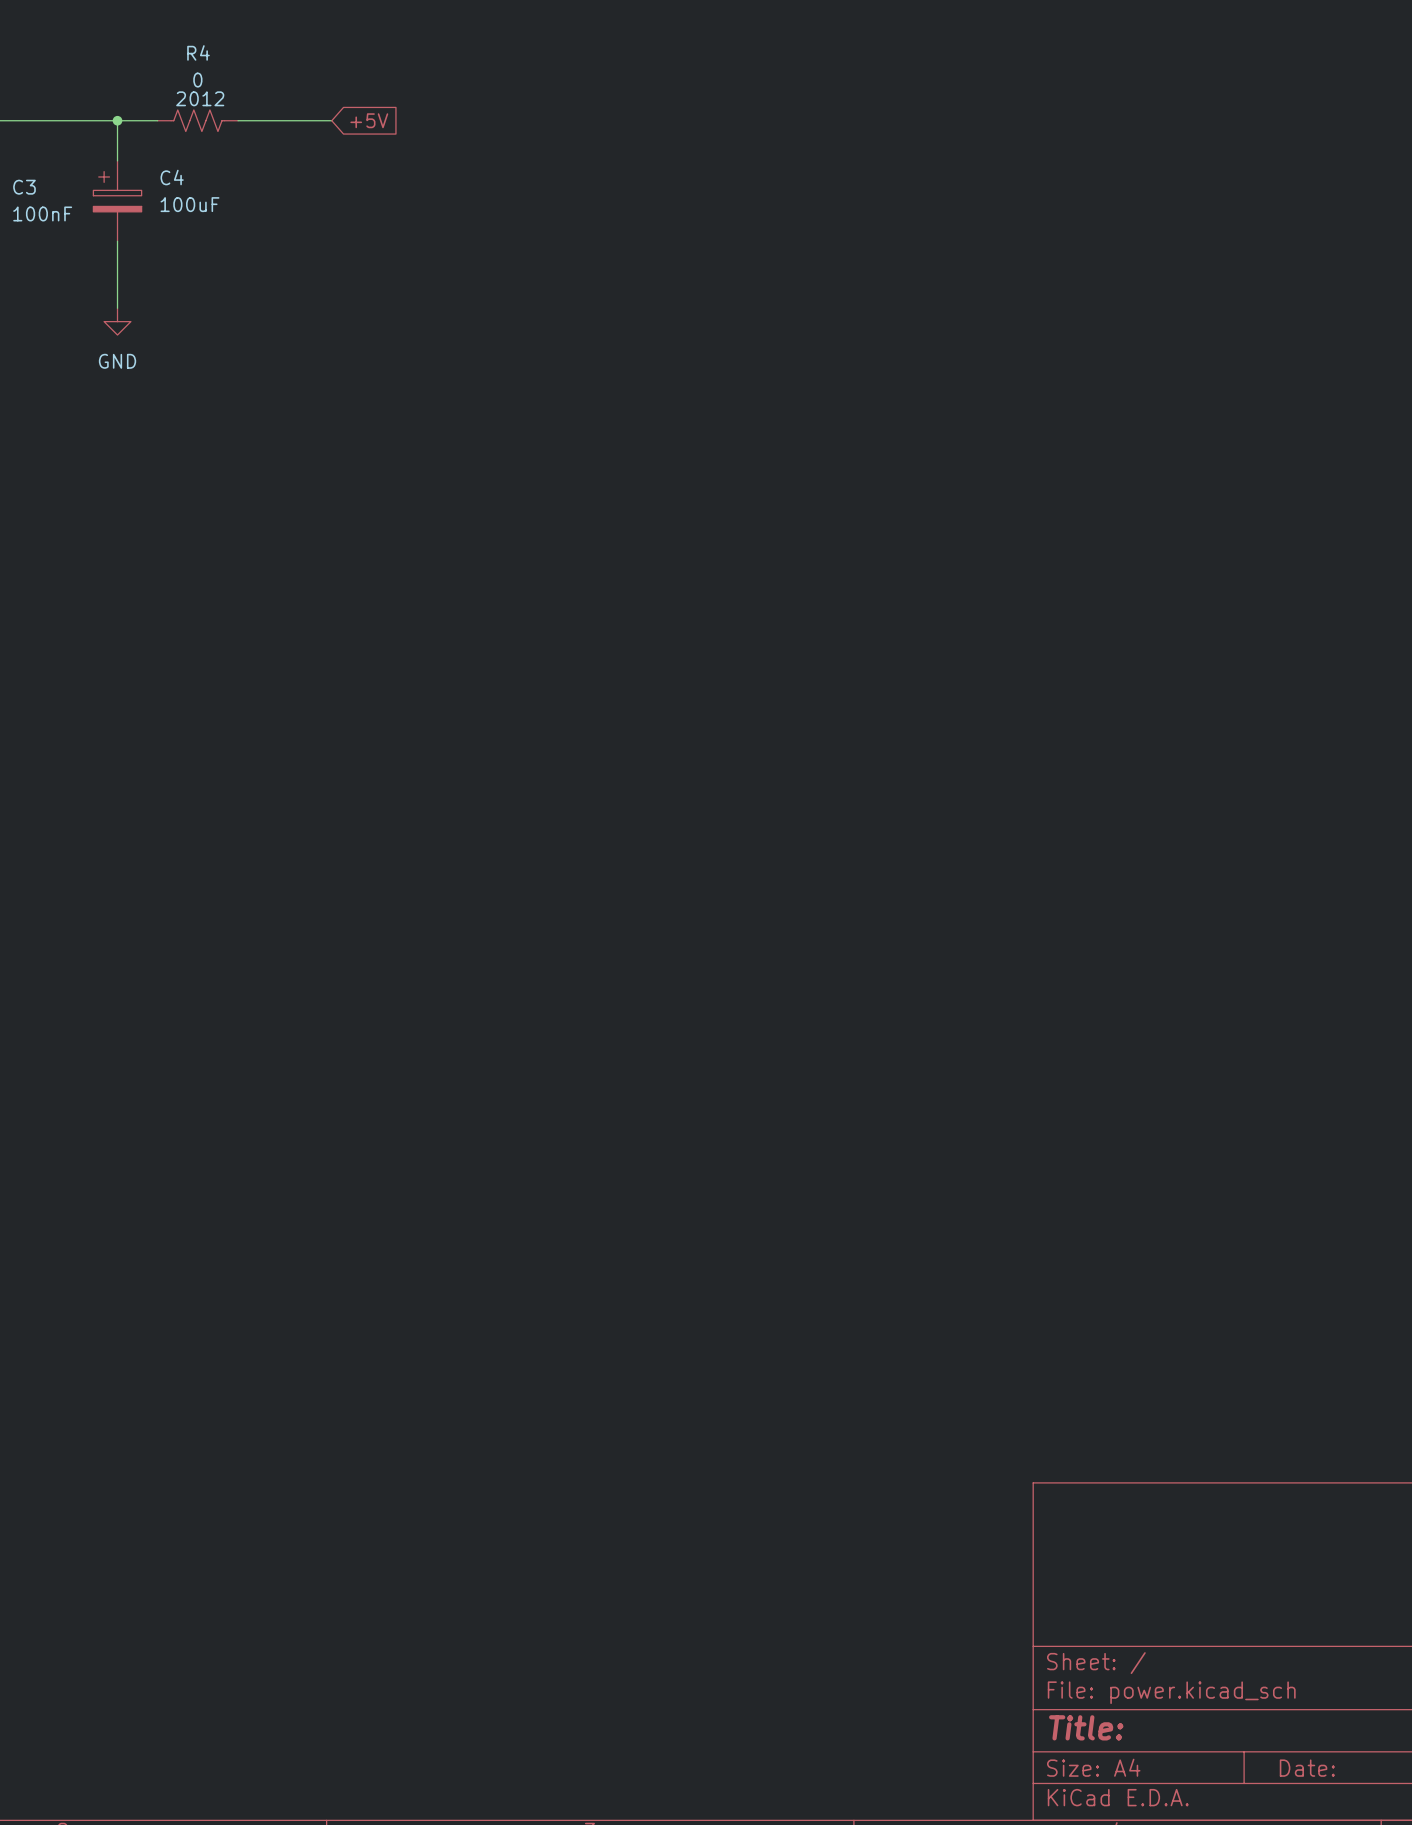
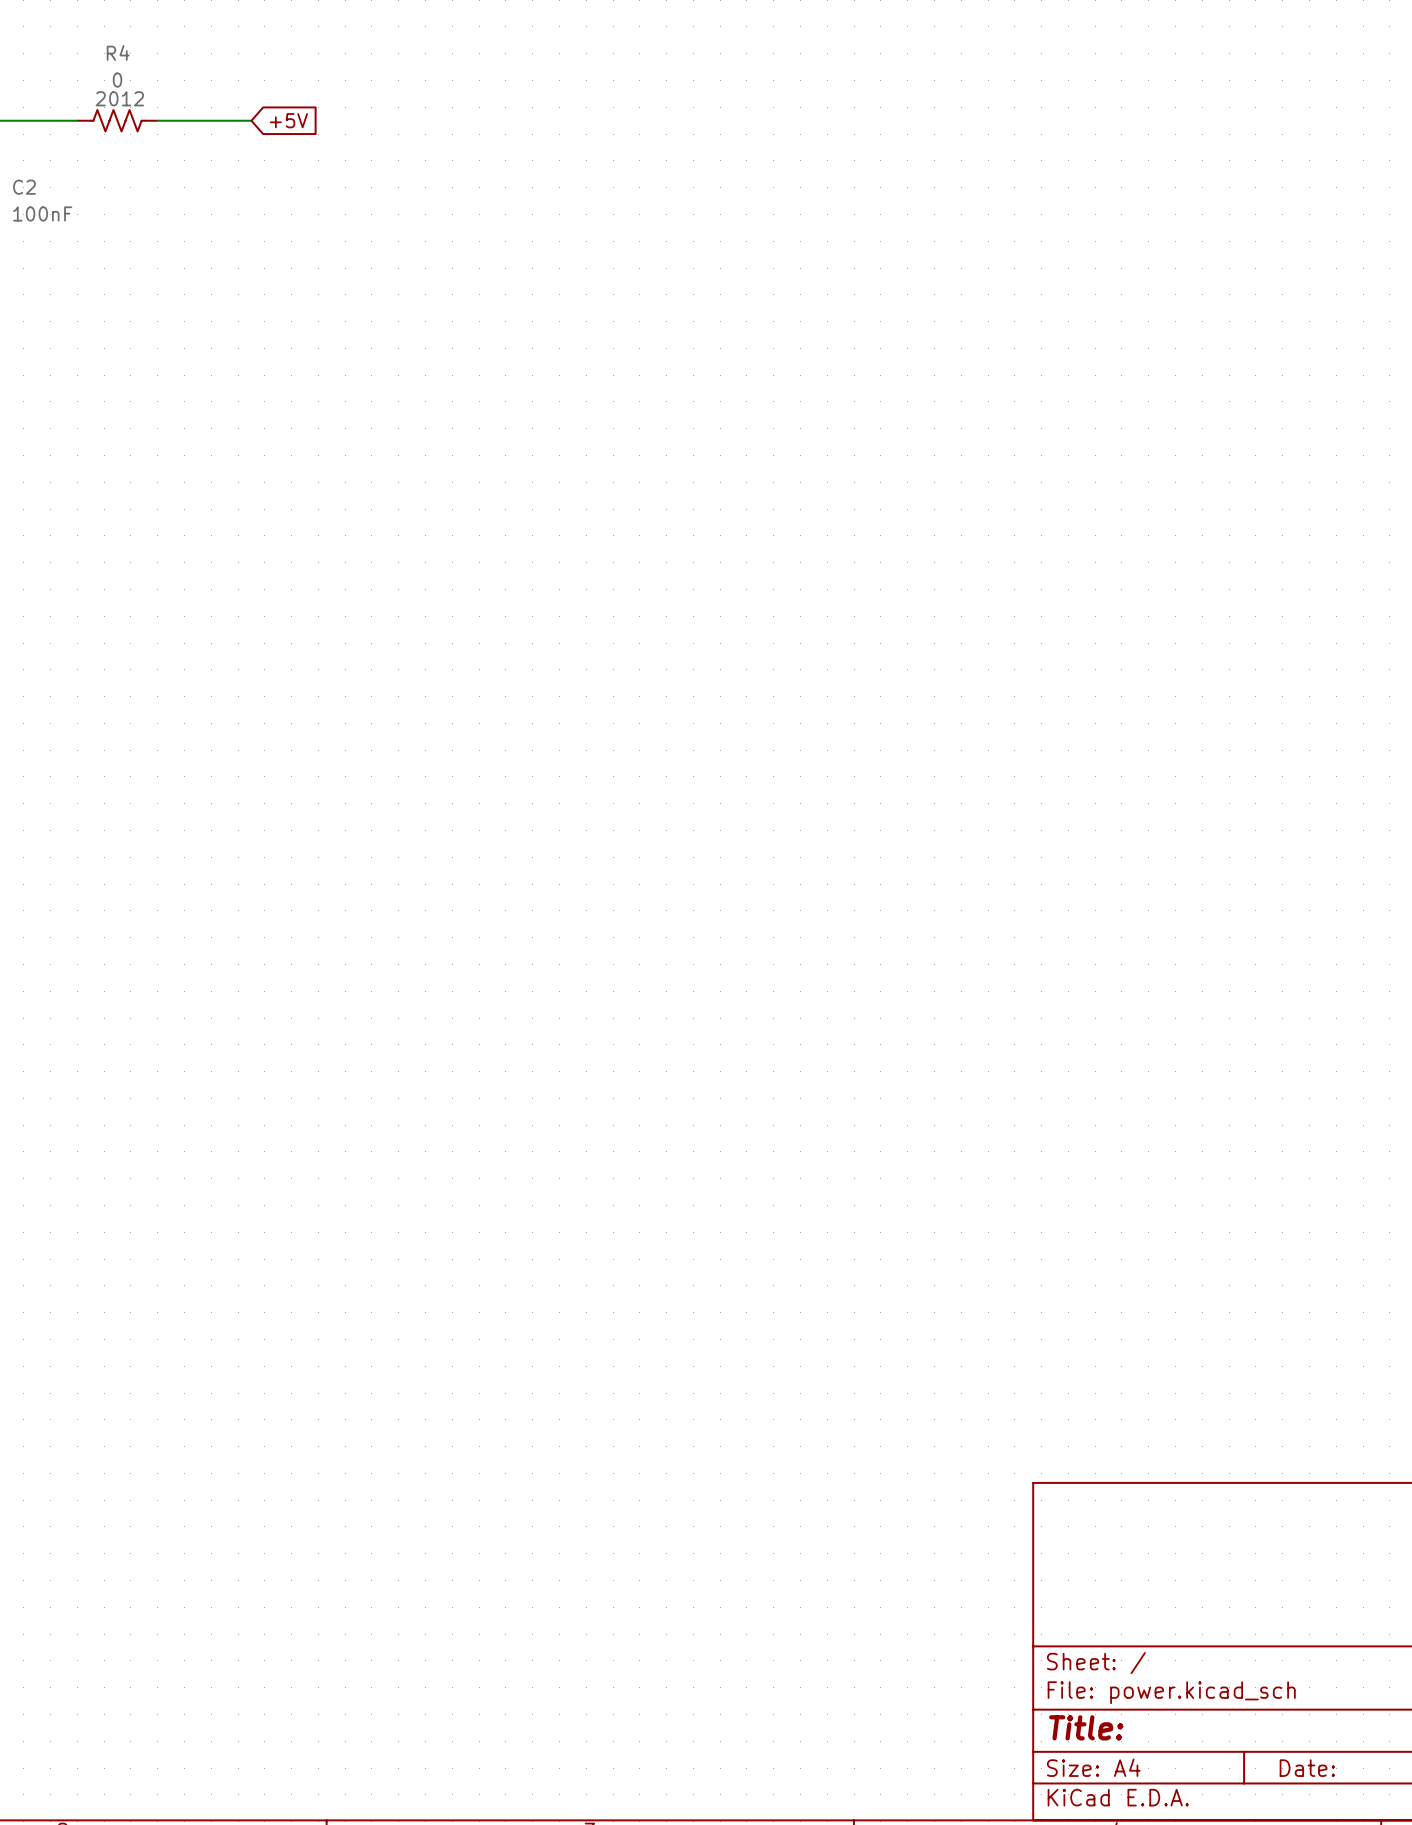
wire: (117, 120) (117, 160) -> none
junction: (117, 120) -> none
R4 position: (197, 120) -> (117, 120)
wire: (251, 120) (331, 120) -> none
global label position: +5V (369, 120) -> +5V (288, 120)
C3 name: C3 (24, 187) -> C2 (24, 187)
C4: 100uF (117, 201) -> none
wire: (117, 241) (117, 308) -> none
power symbol: GND (117, 321) -> none

